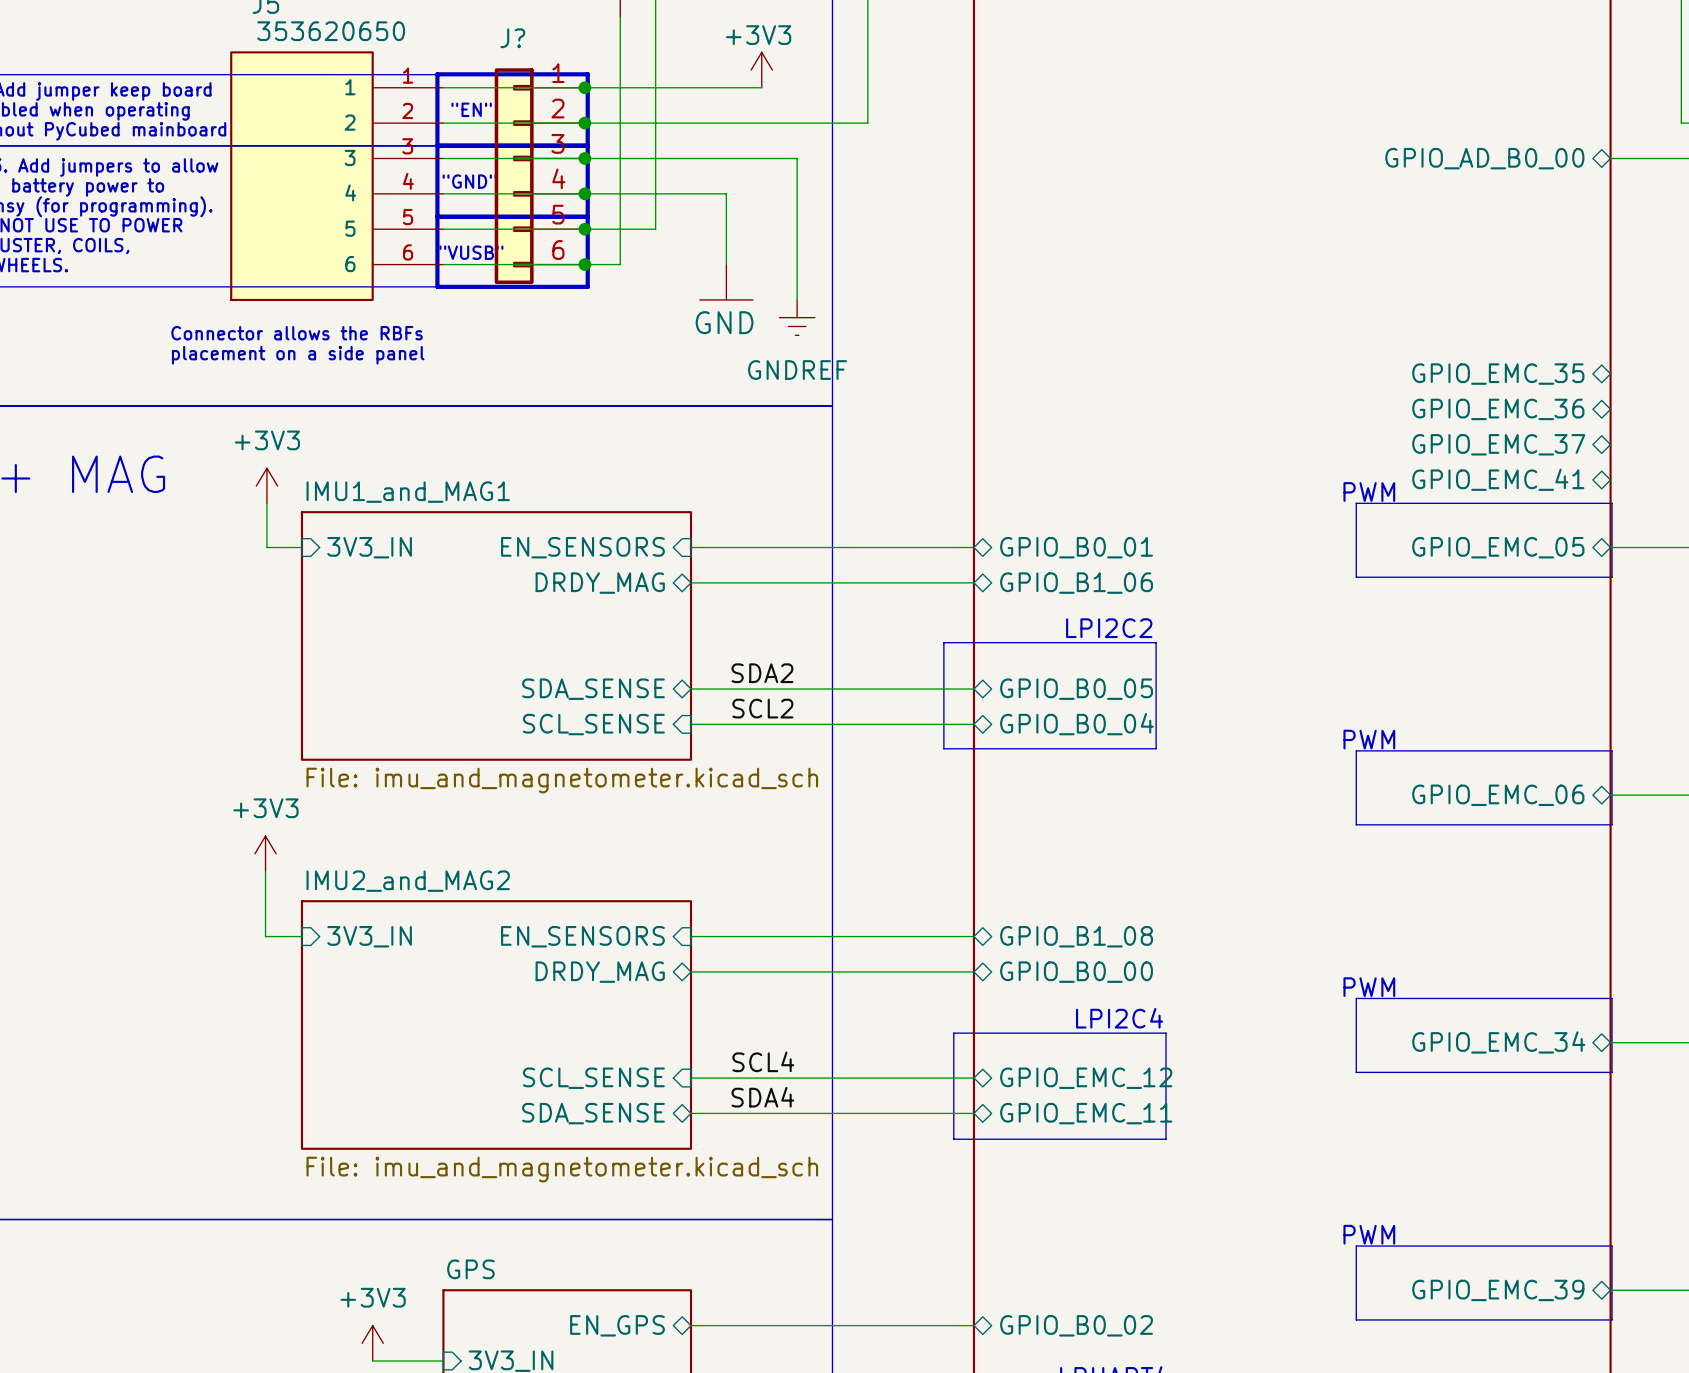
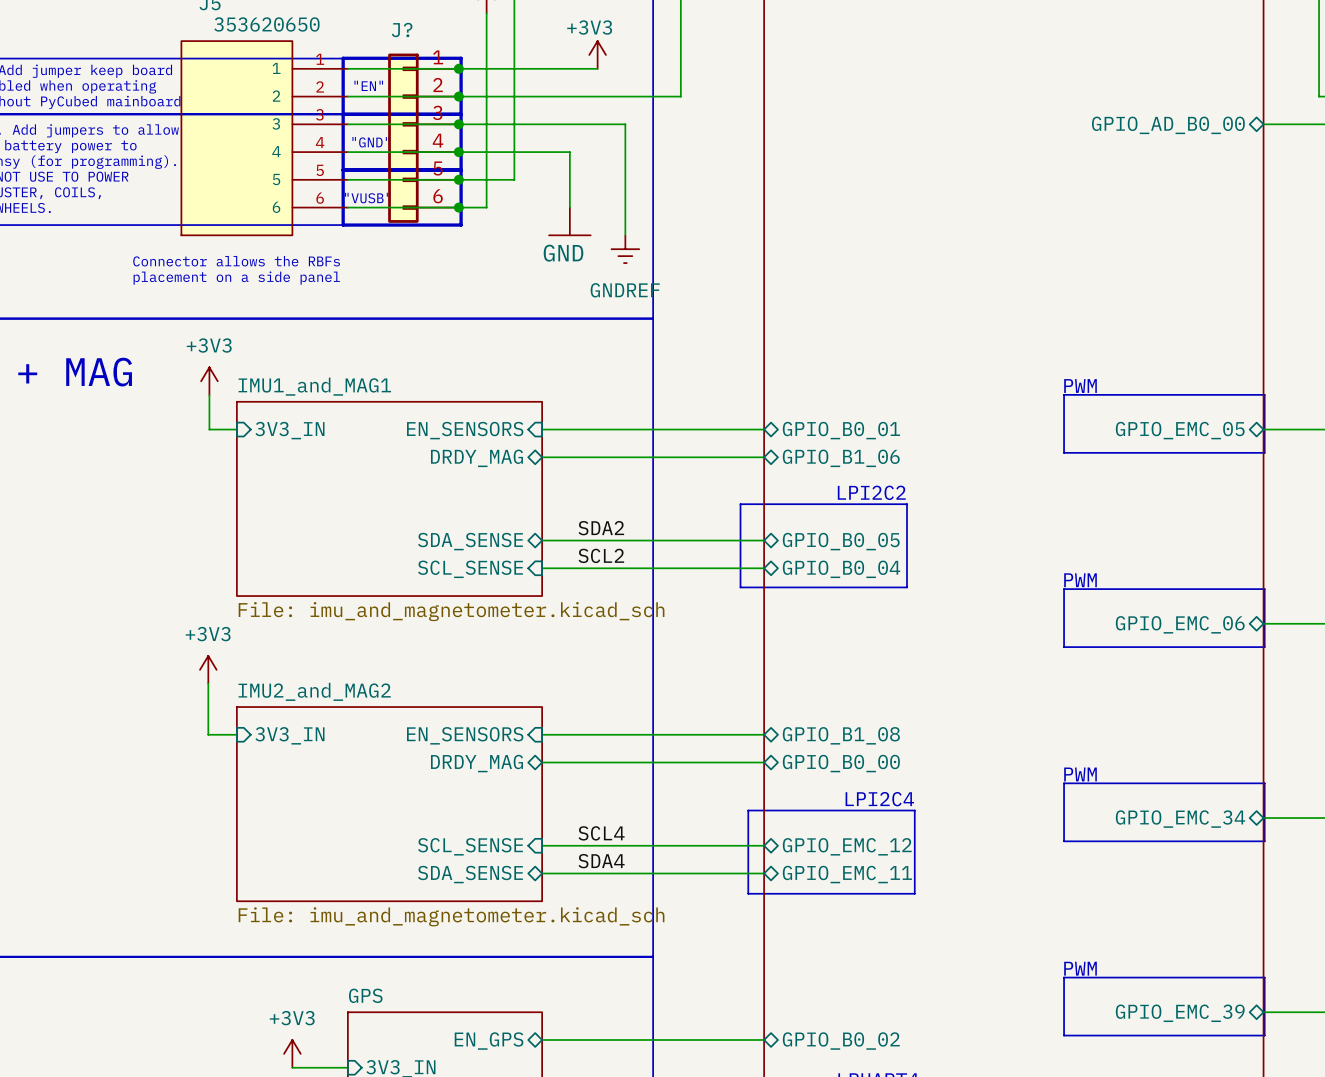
sheet pin: GPIO_EMC_35 (1498, 374) -> none
sheet pin: GPIO_EMC_36 (1498, 409) -> none
sheet pin: GPIO_EMC_37 (1498, 444) -> none
sheet pin: GPIO_EMC_41 (1498, 479) -> none

